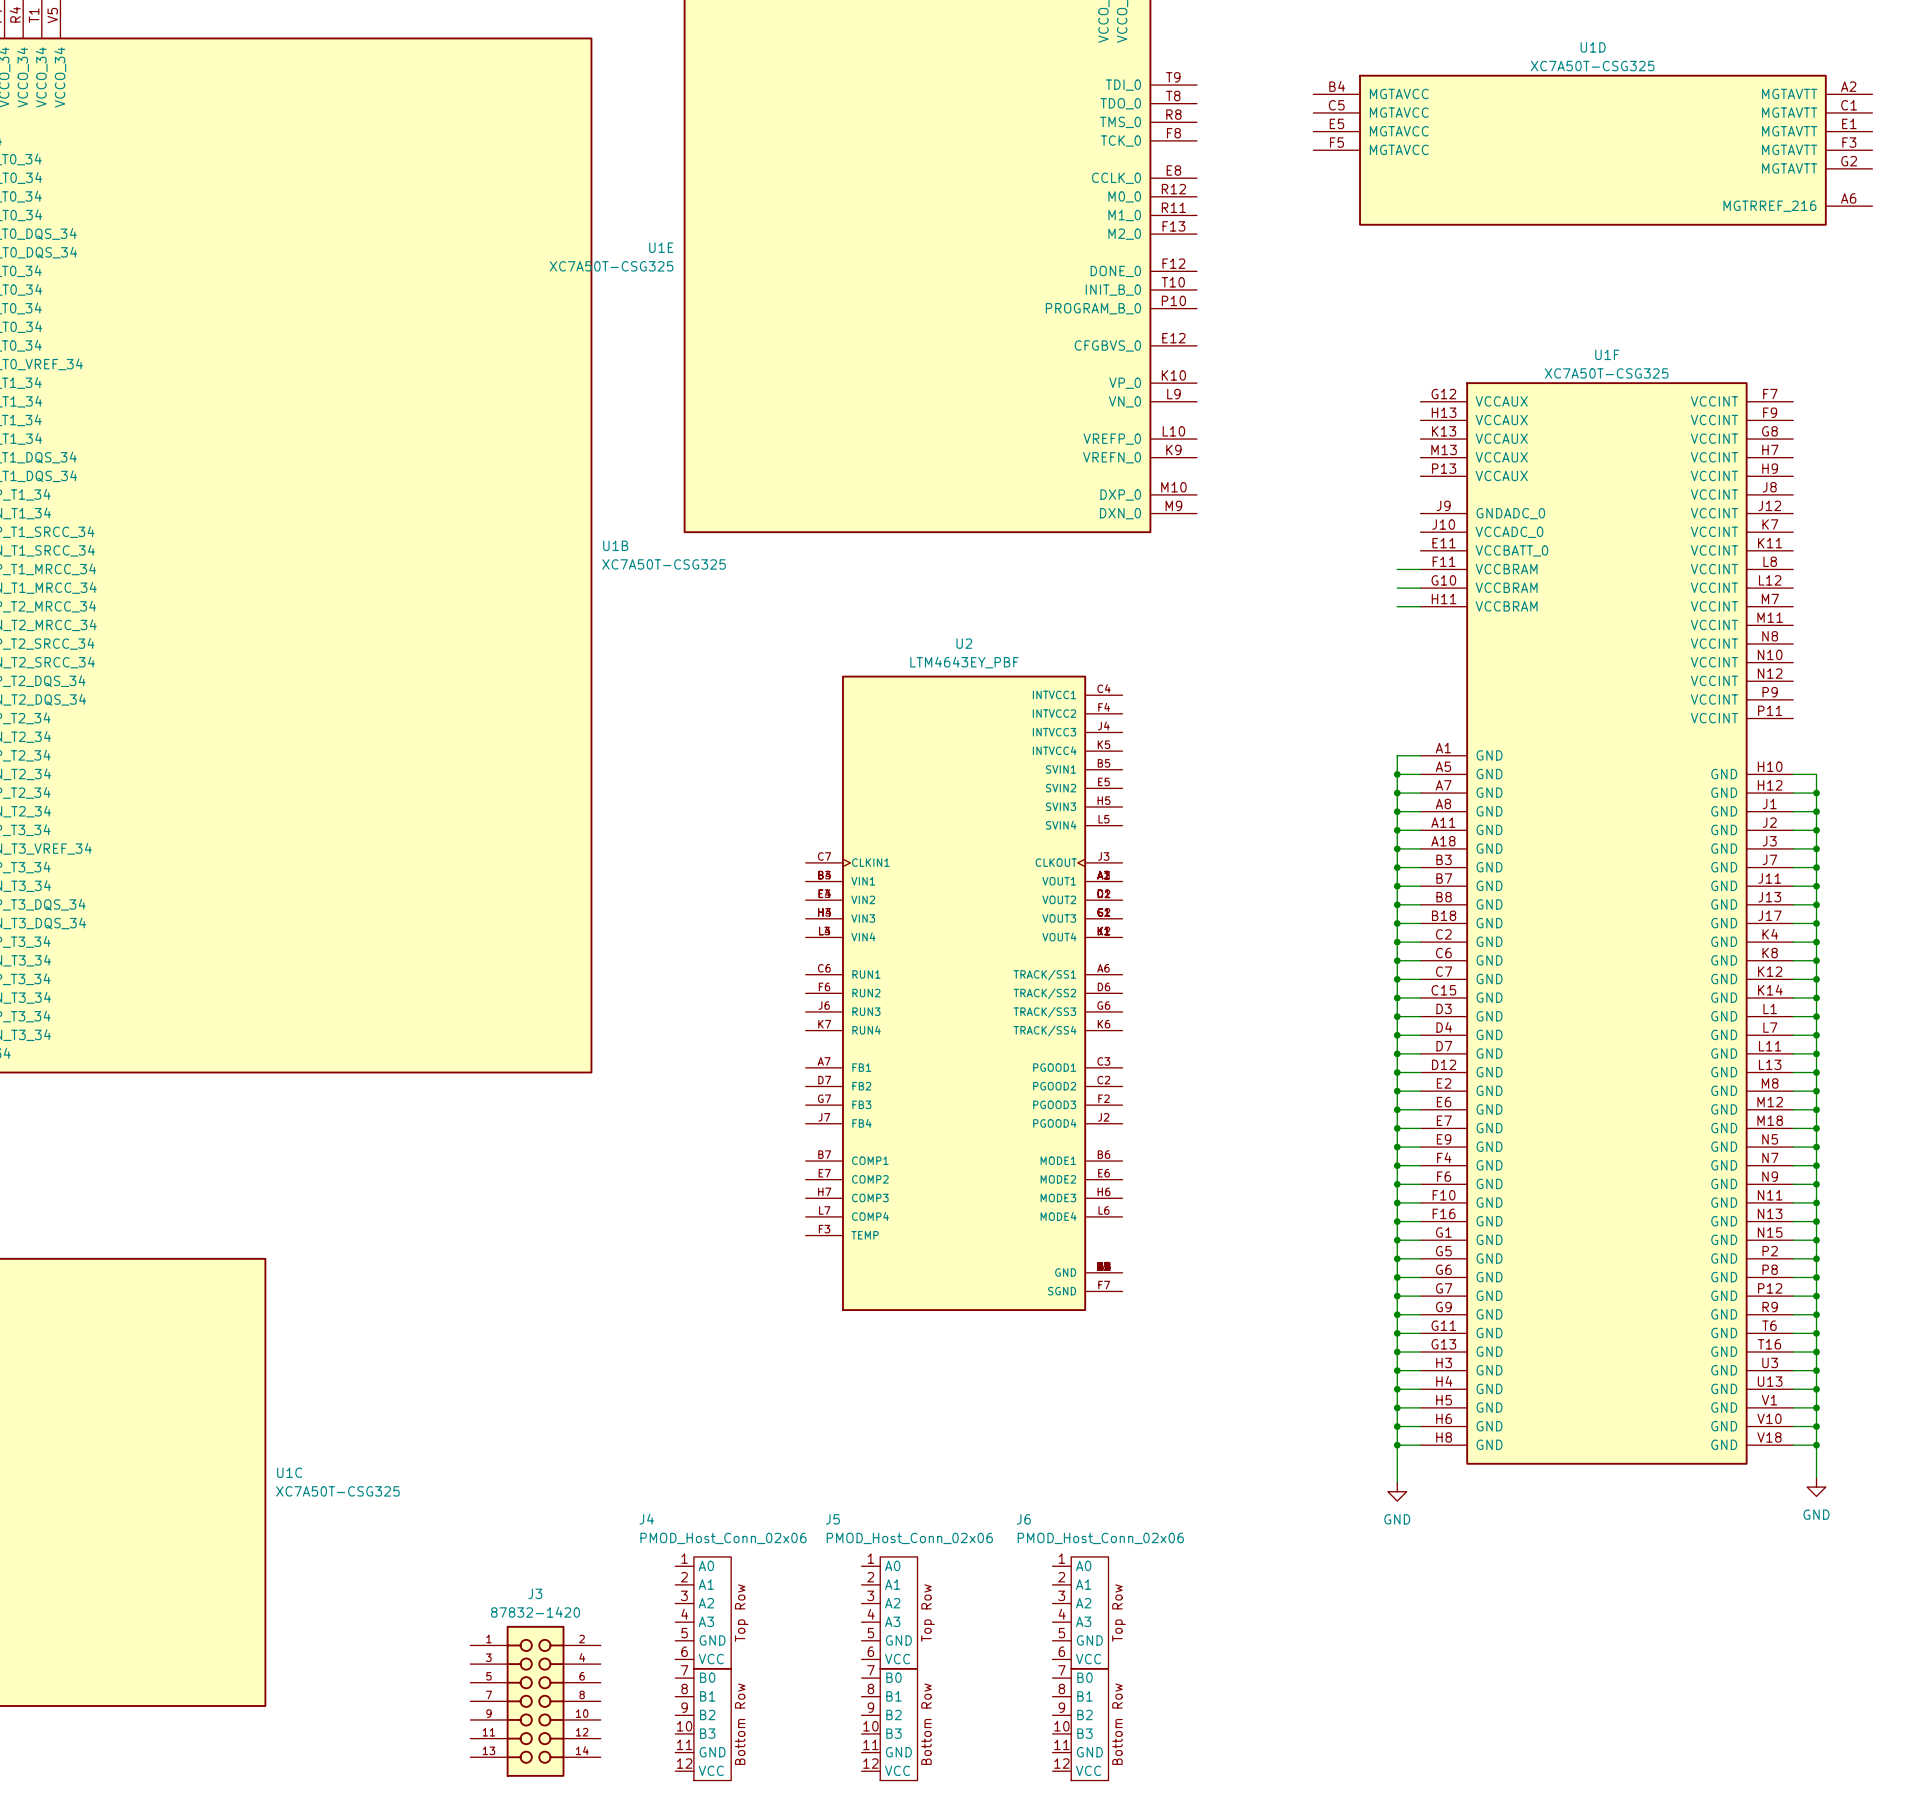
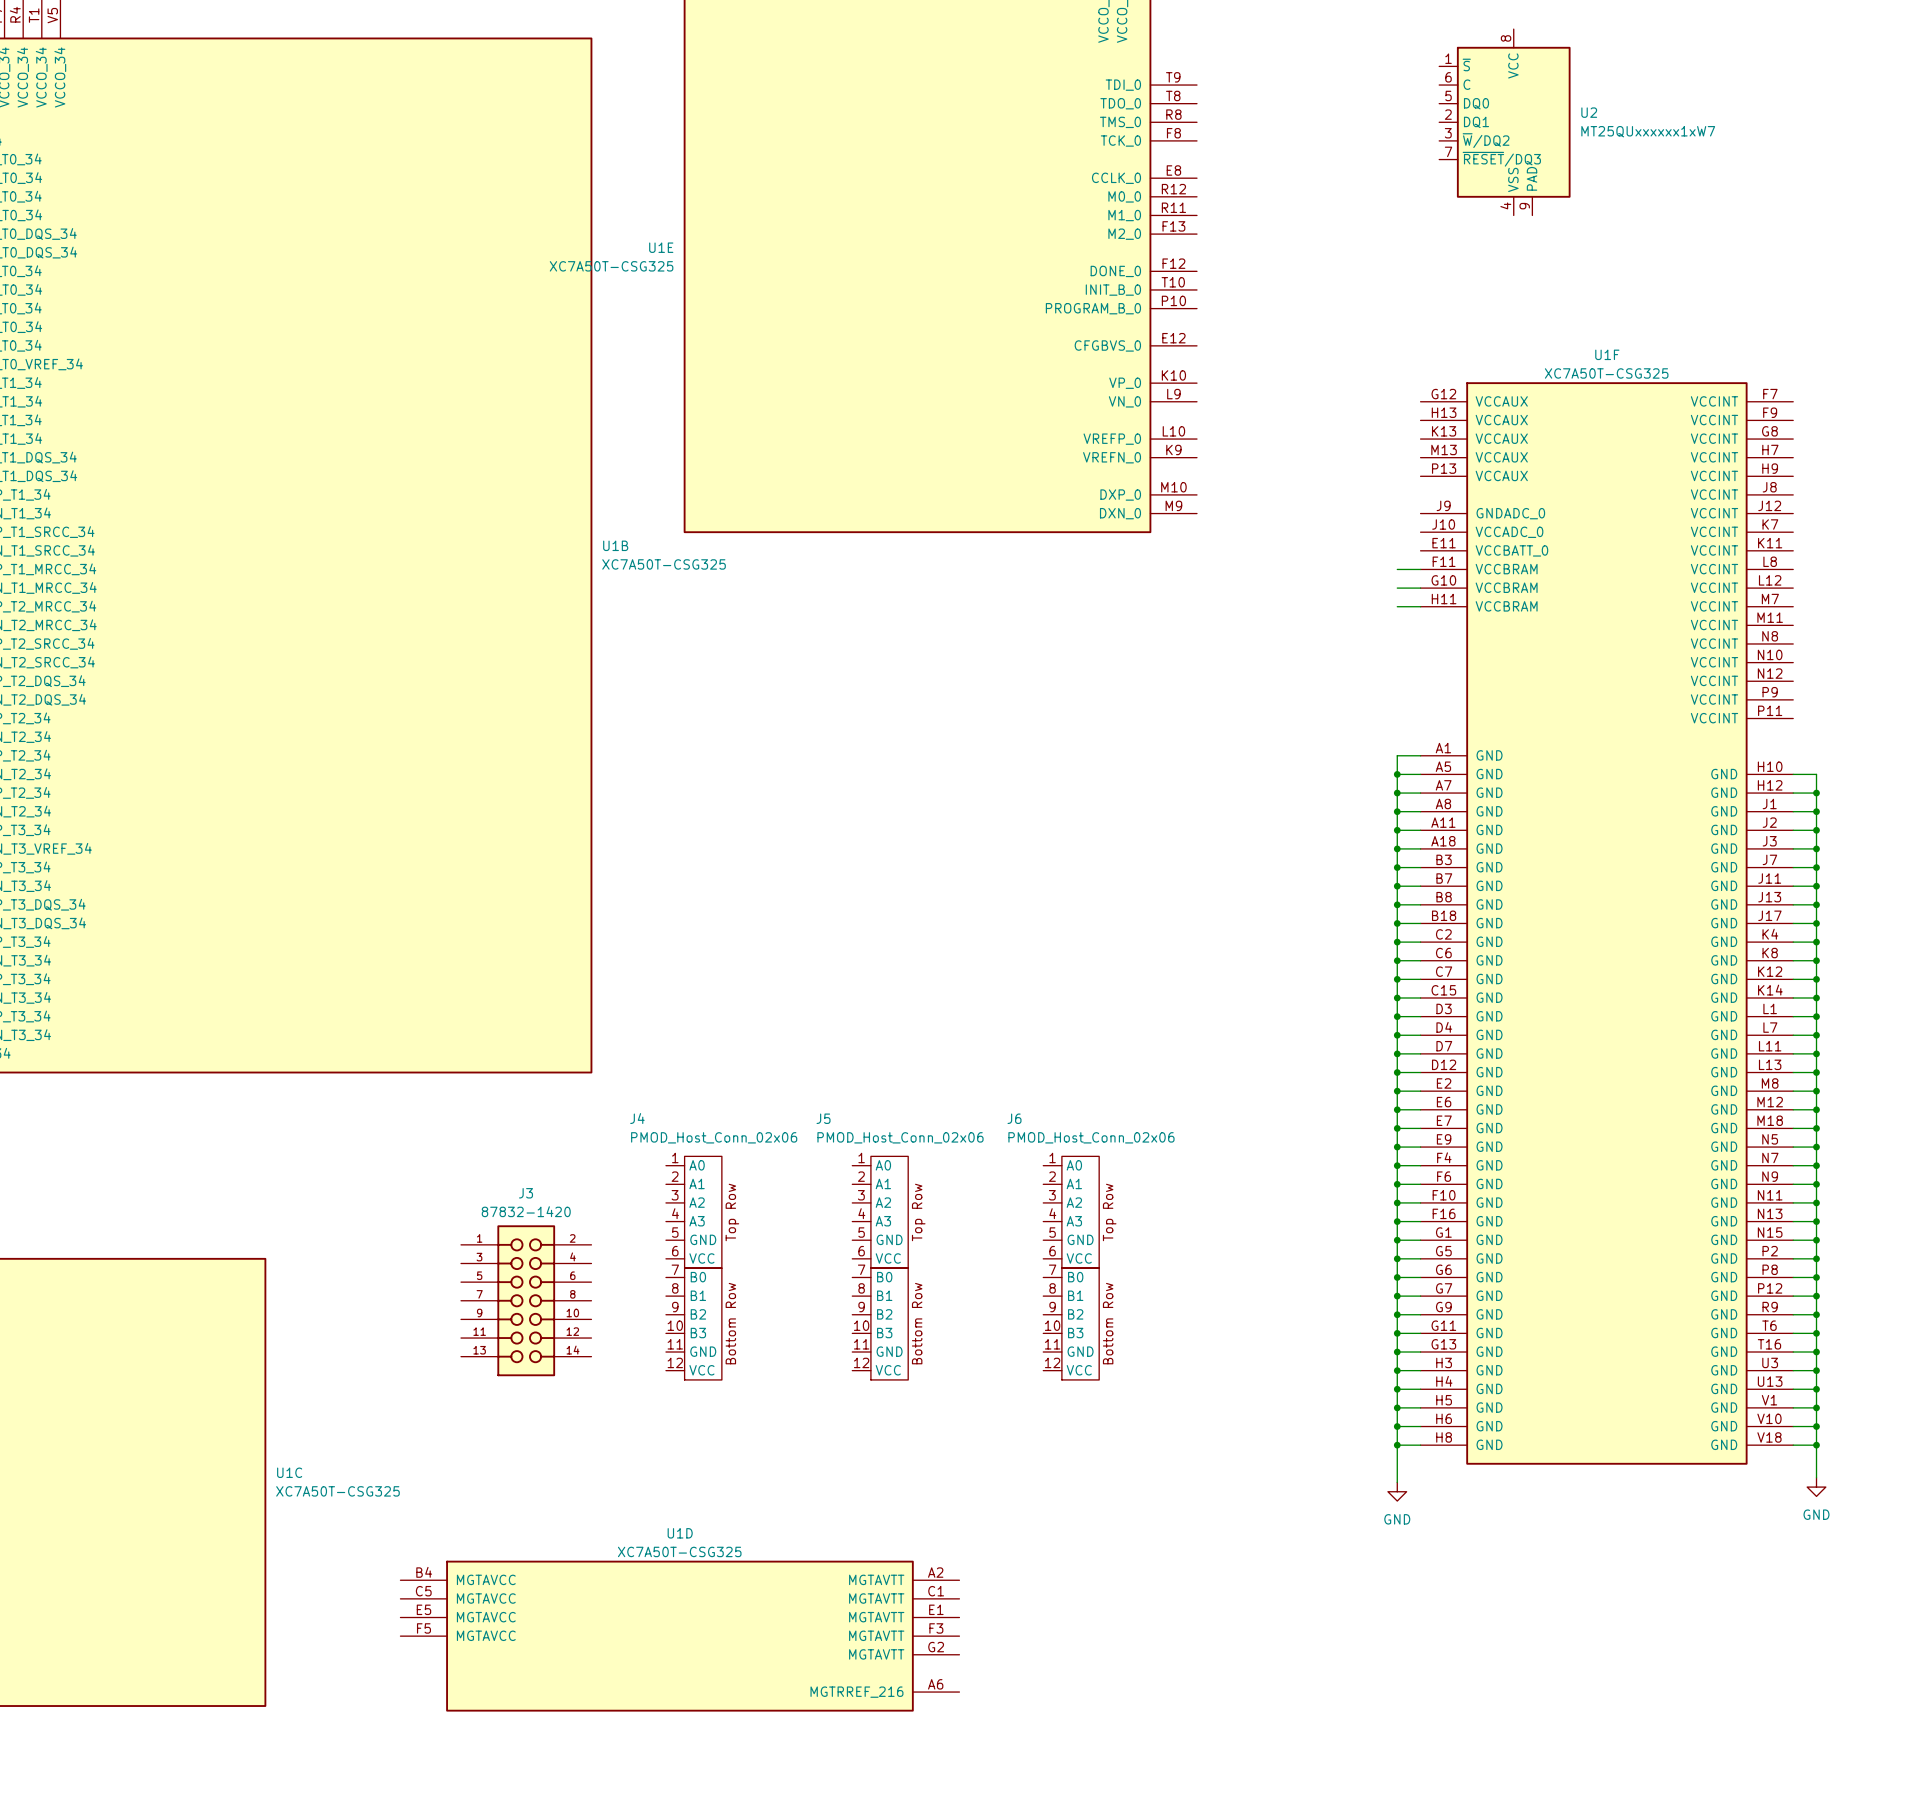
U1D position: (1592, 150) -> (679, 1636)
U2 name position: U2 (964, 643) -> U2 (1589, 112)
U2 value: LTM4643EY_PBF (964, 662) -> MT25QUxxxxxx1xW7 (1648, 131)
U2 symbol: [805, 675, 1123, 1312] -> [1439, 29, 1571, 216]
J4 position: (703, 1668) -> (693, 1268)
J5 position: (889, 1668) -> (880, 1268)
J6 position: (1080, 1668) -> (1071, 1268)
J3 position: (535, 1701) -> (526, 1300)

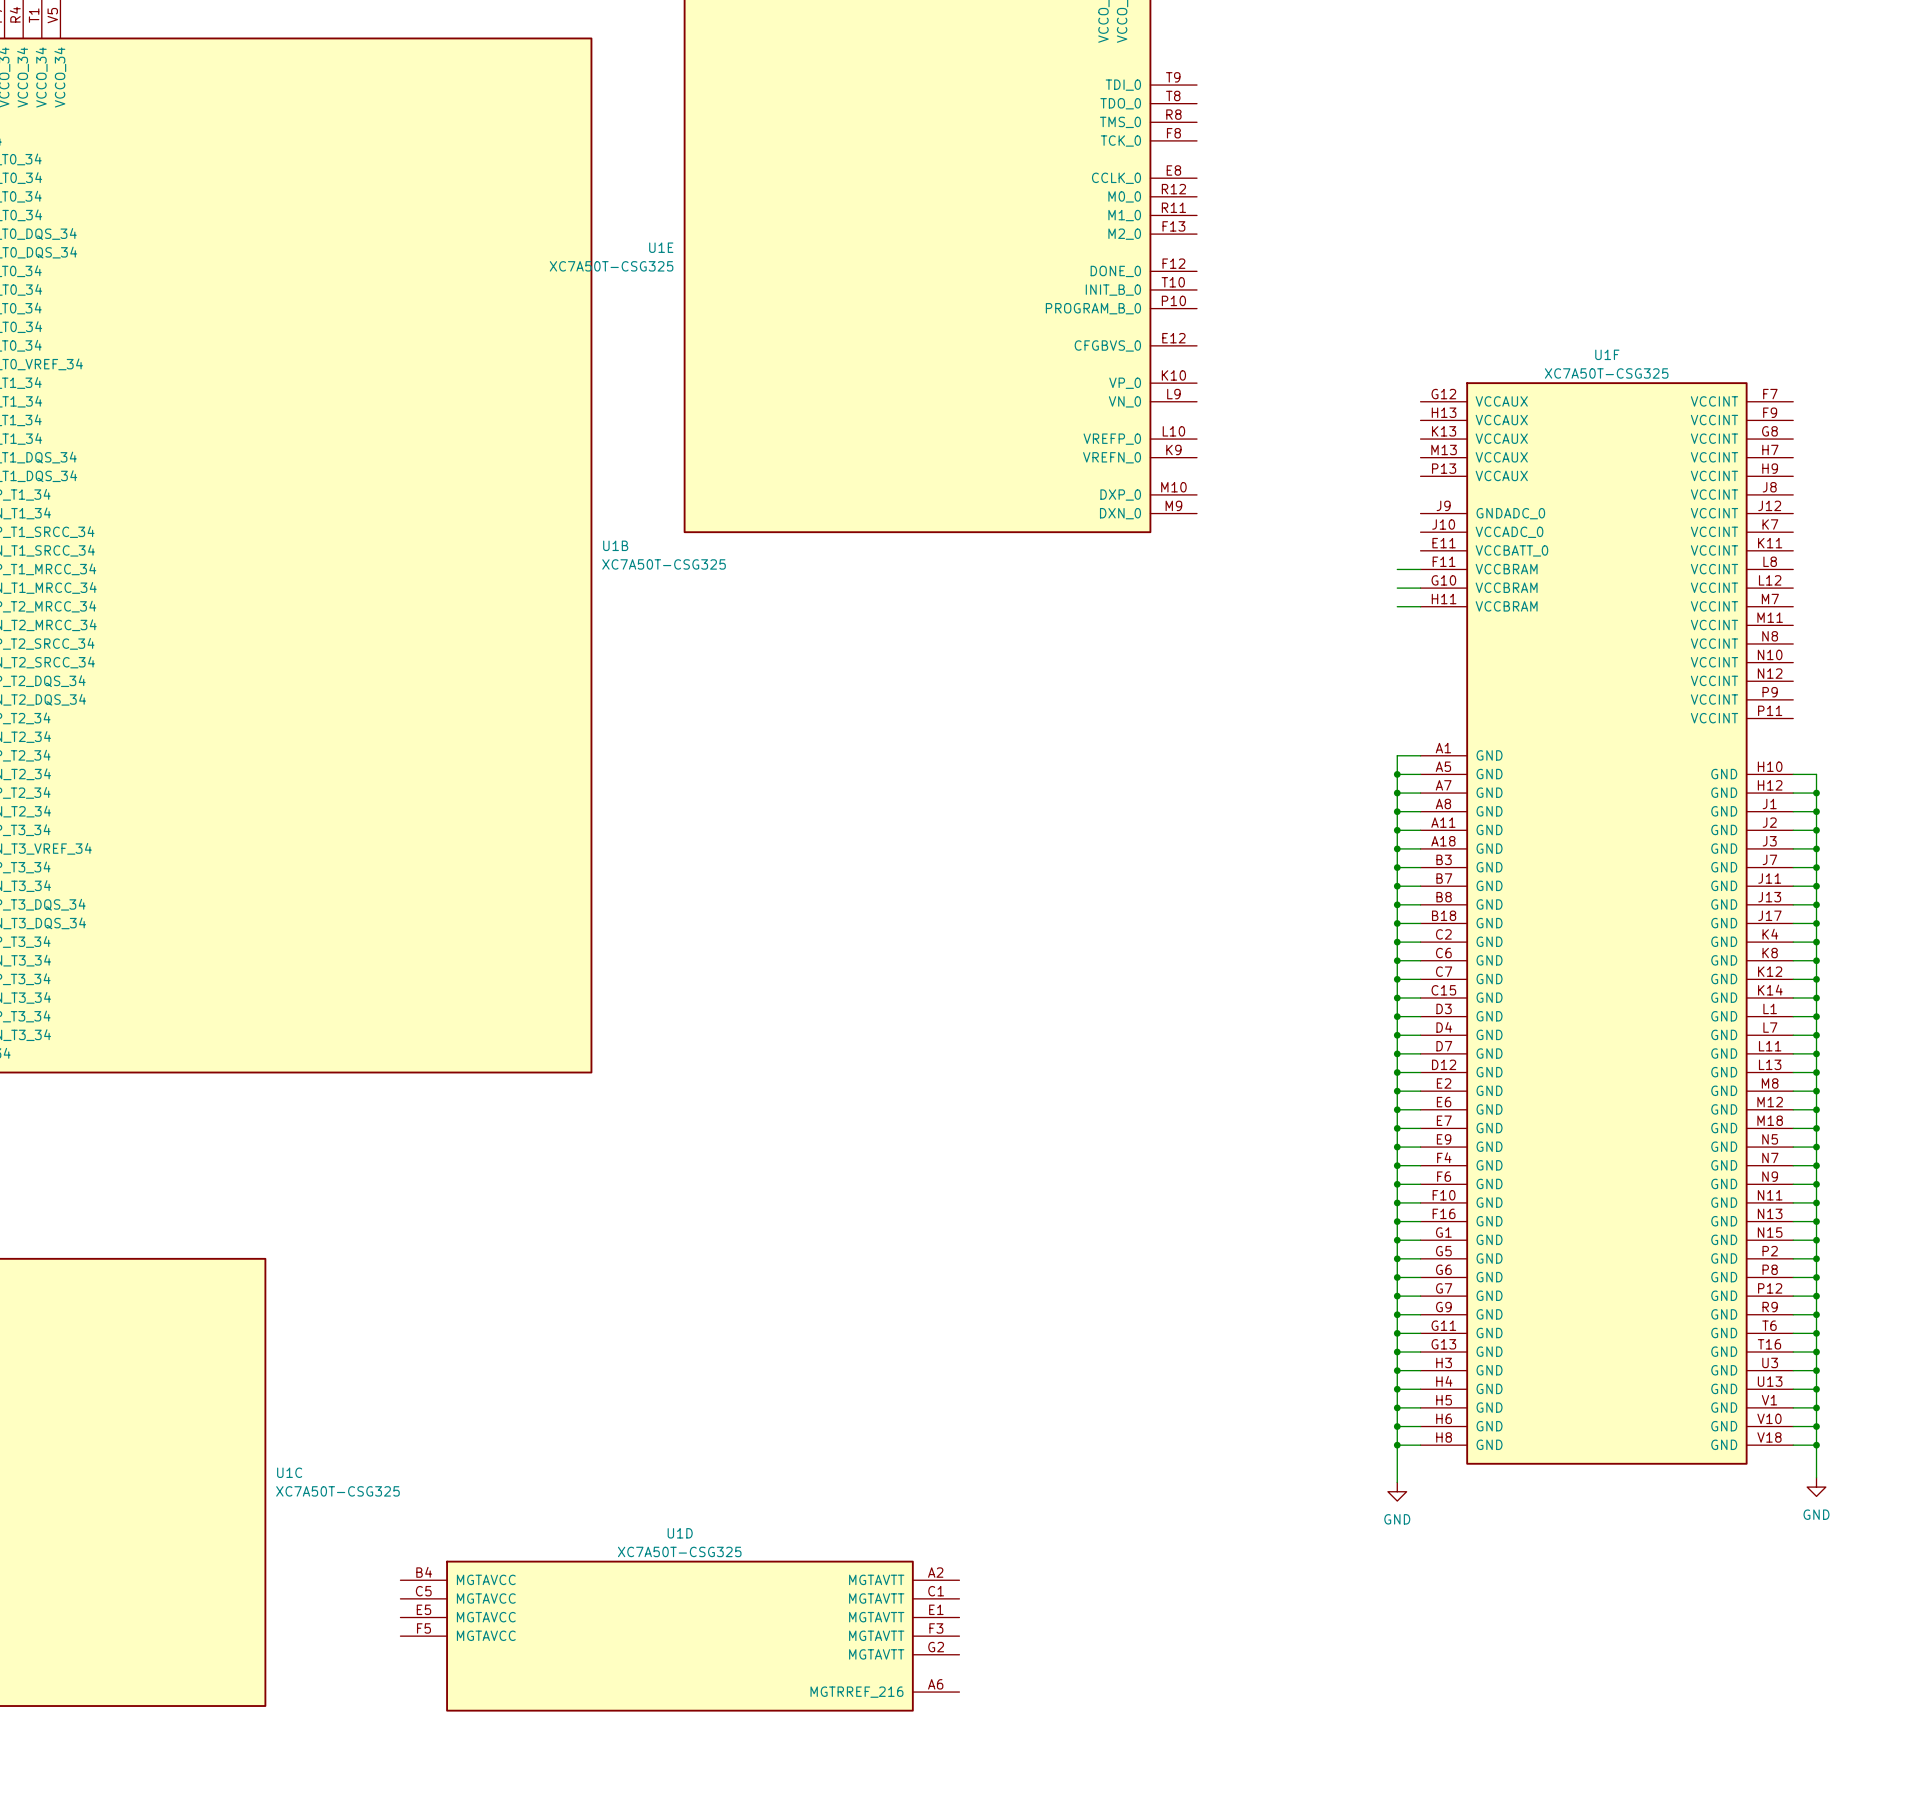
U2: MT25QUxxxxxx1xW7 (1504, 122) -> none
J4: PMOD_Host_Conn_02x06 (693, 1268) -> none
J5: PMOD_Host_Conn_02x06 (880, 1268) -> none
J6: PMOD_Host_Conn_02x06 (1071, 1268) -> none
J3: 87832-1420 (526, 1300) -> none

